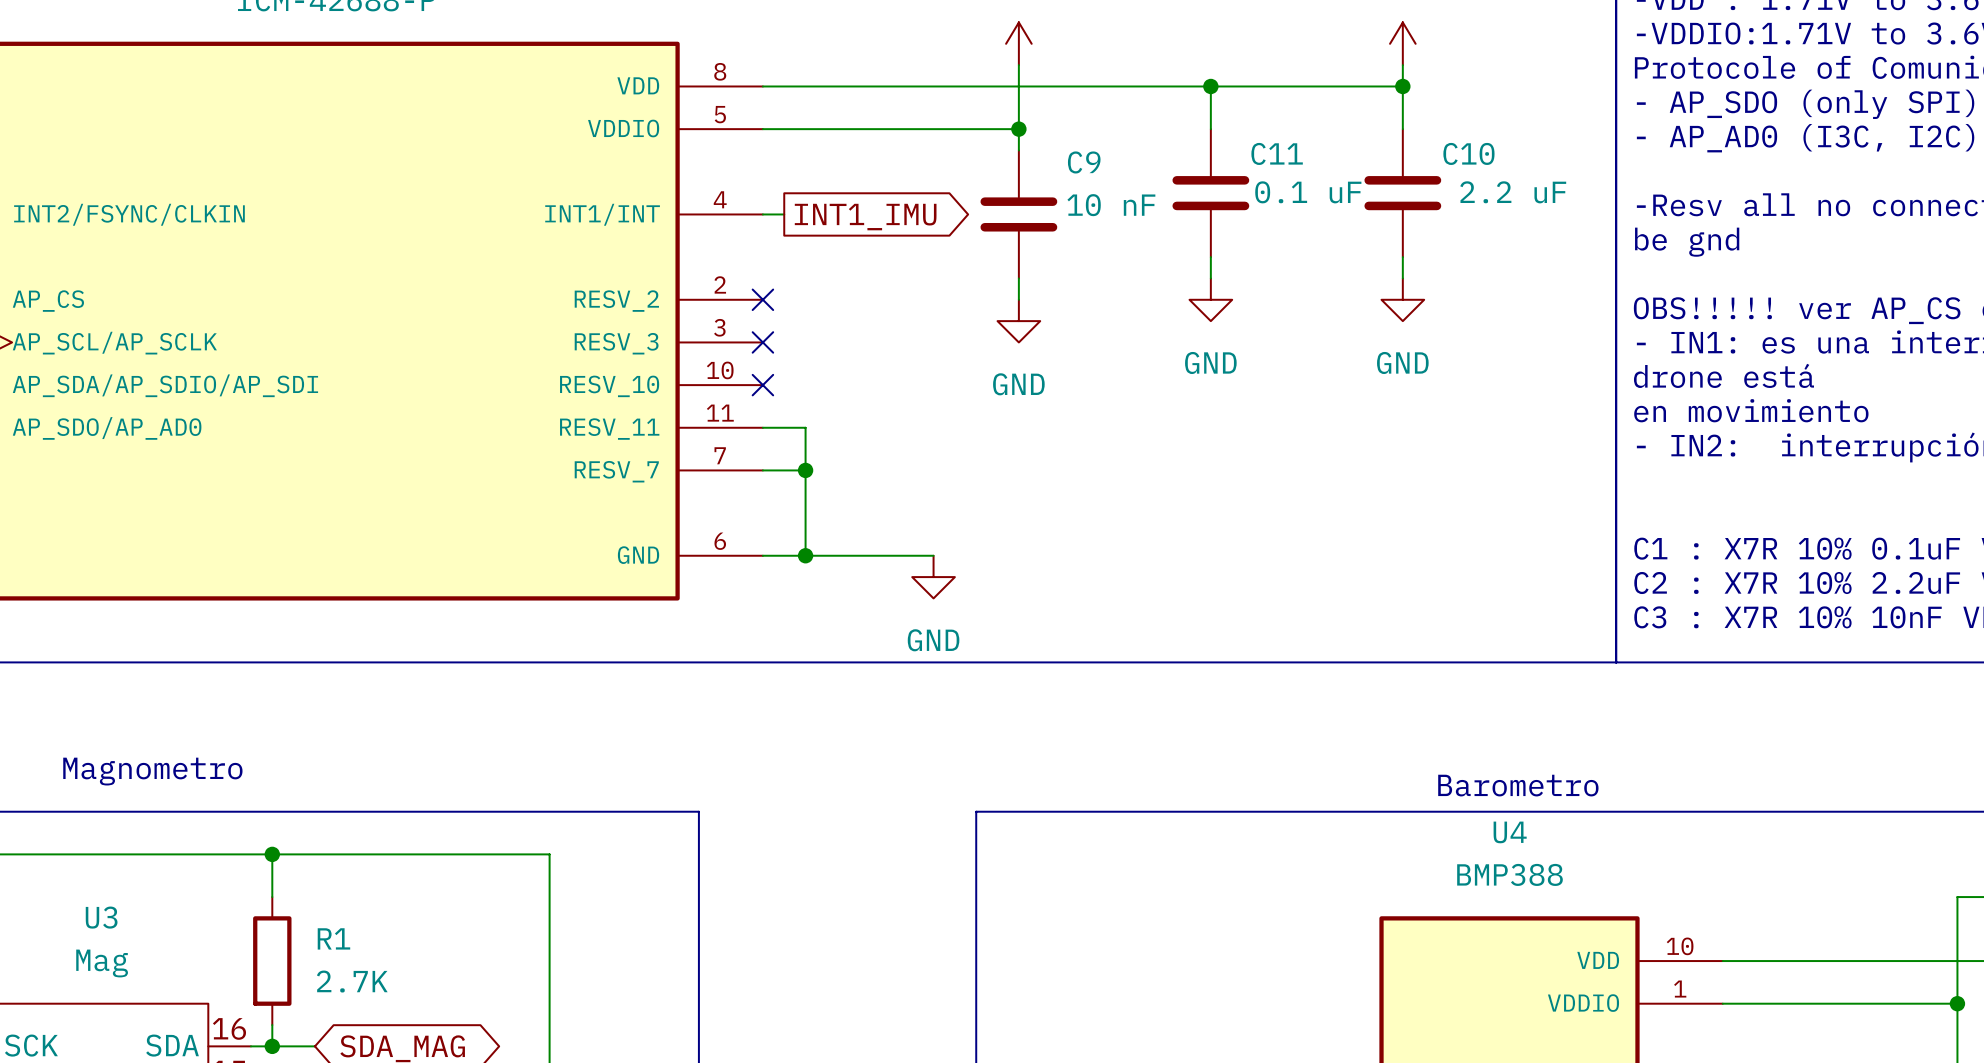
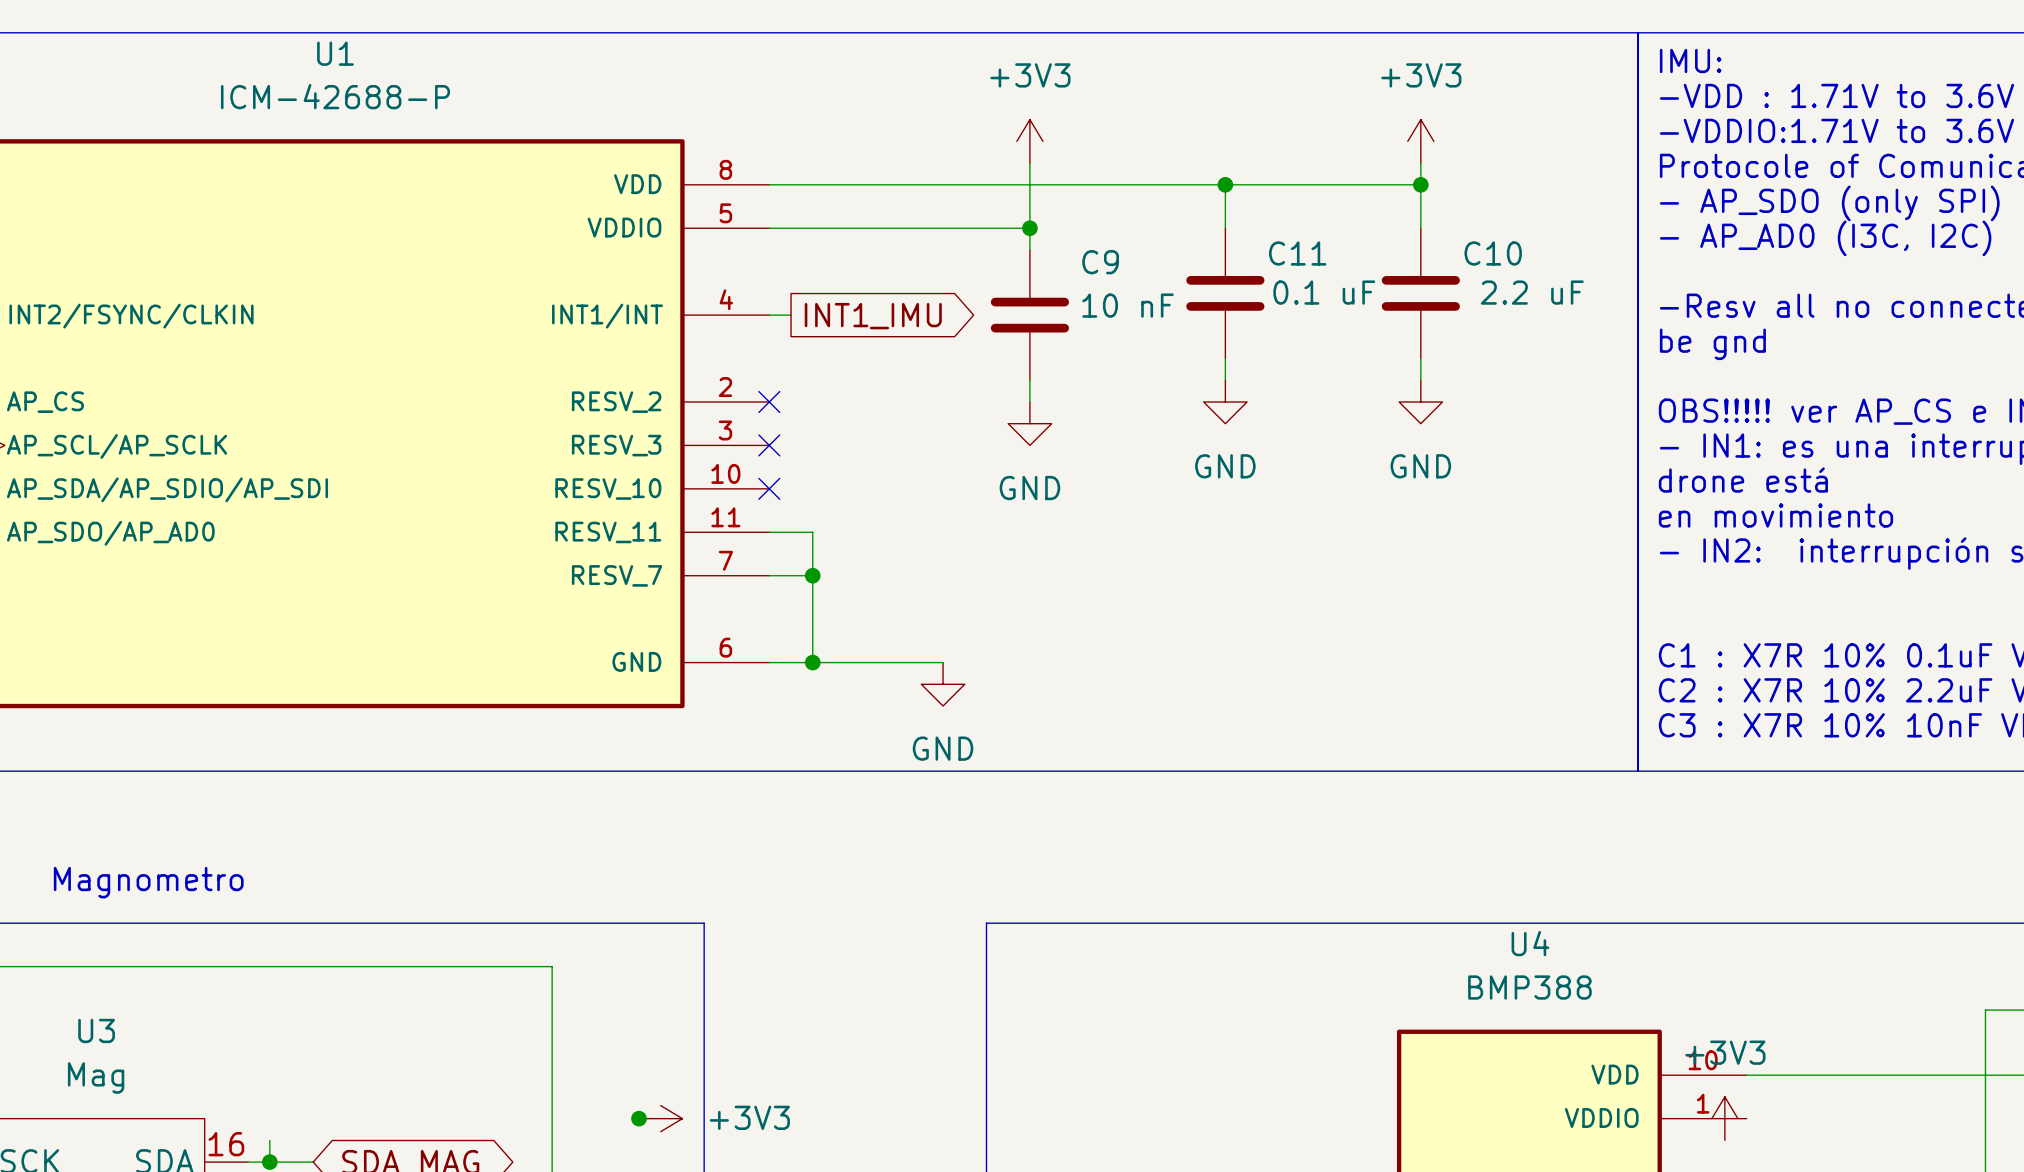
text: Barometro (1518, 785) -> none
wire: (272, 854) (272, 897) -> none
junction: (272, 854) -> none
R1: 2.7K (272, 961) -> none
junction: none -> (639, 1118)
power symbol: none -> +3V3 (660, 1118)
power symbol: none -> +3V3 (1724, 1118)
wire: (1722, 1003) (1957, 1003) -> none
junction: (1957, 1003) -> none

